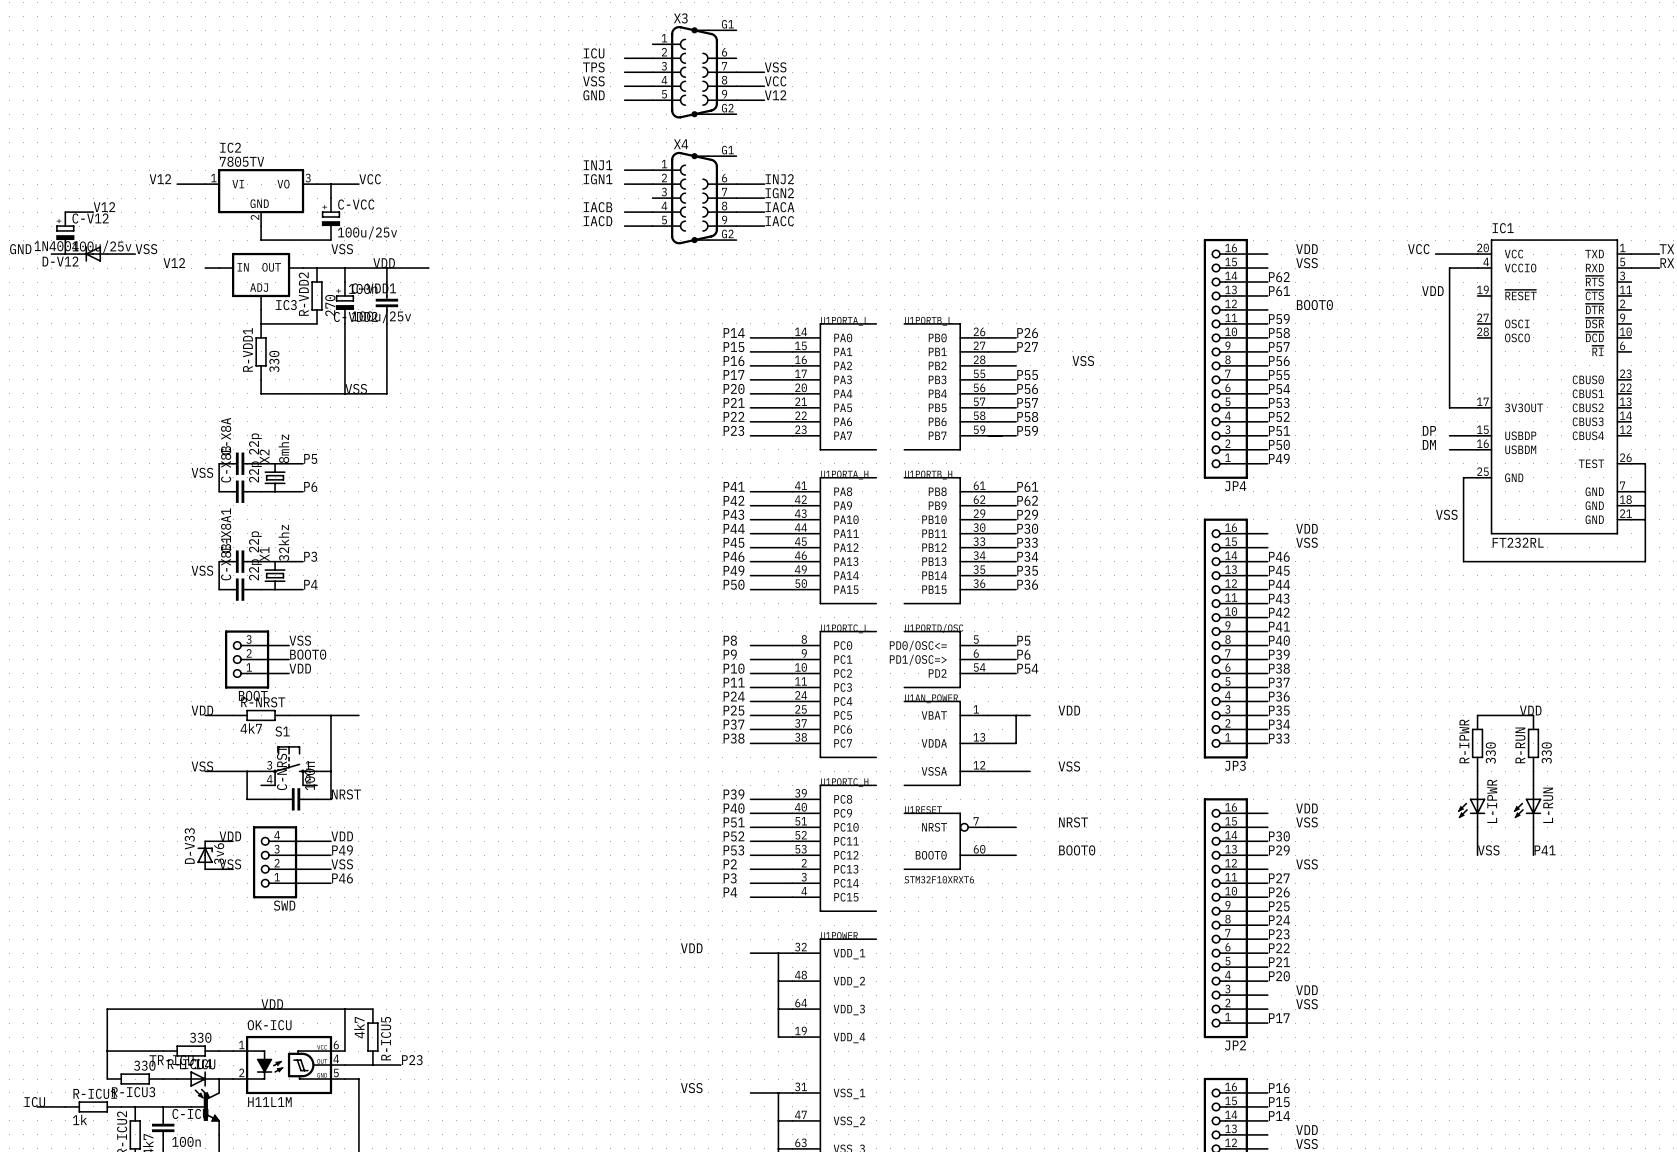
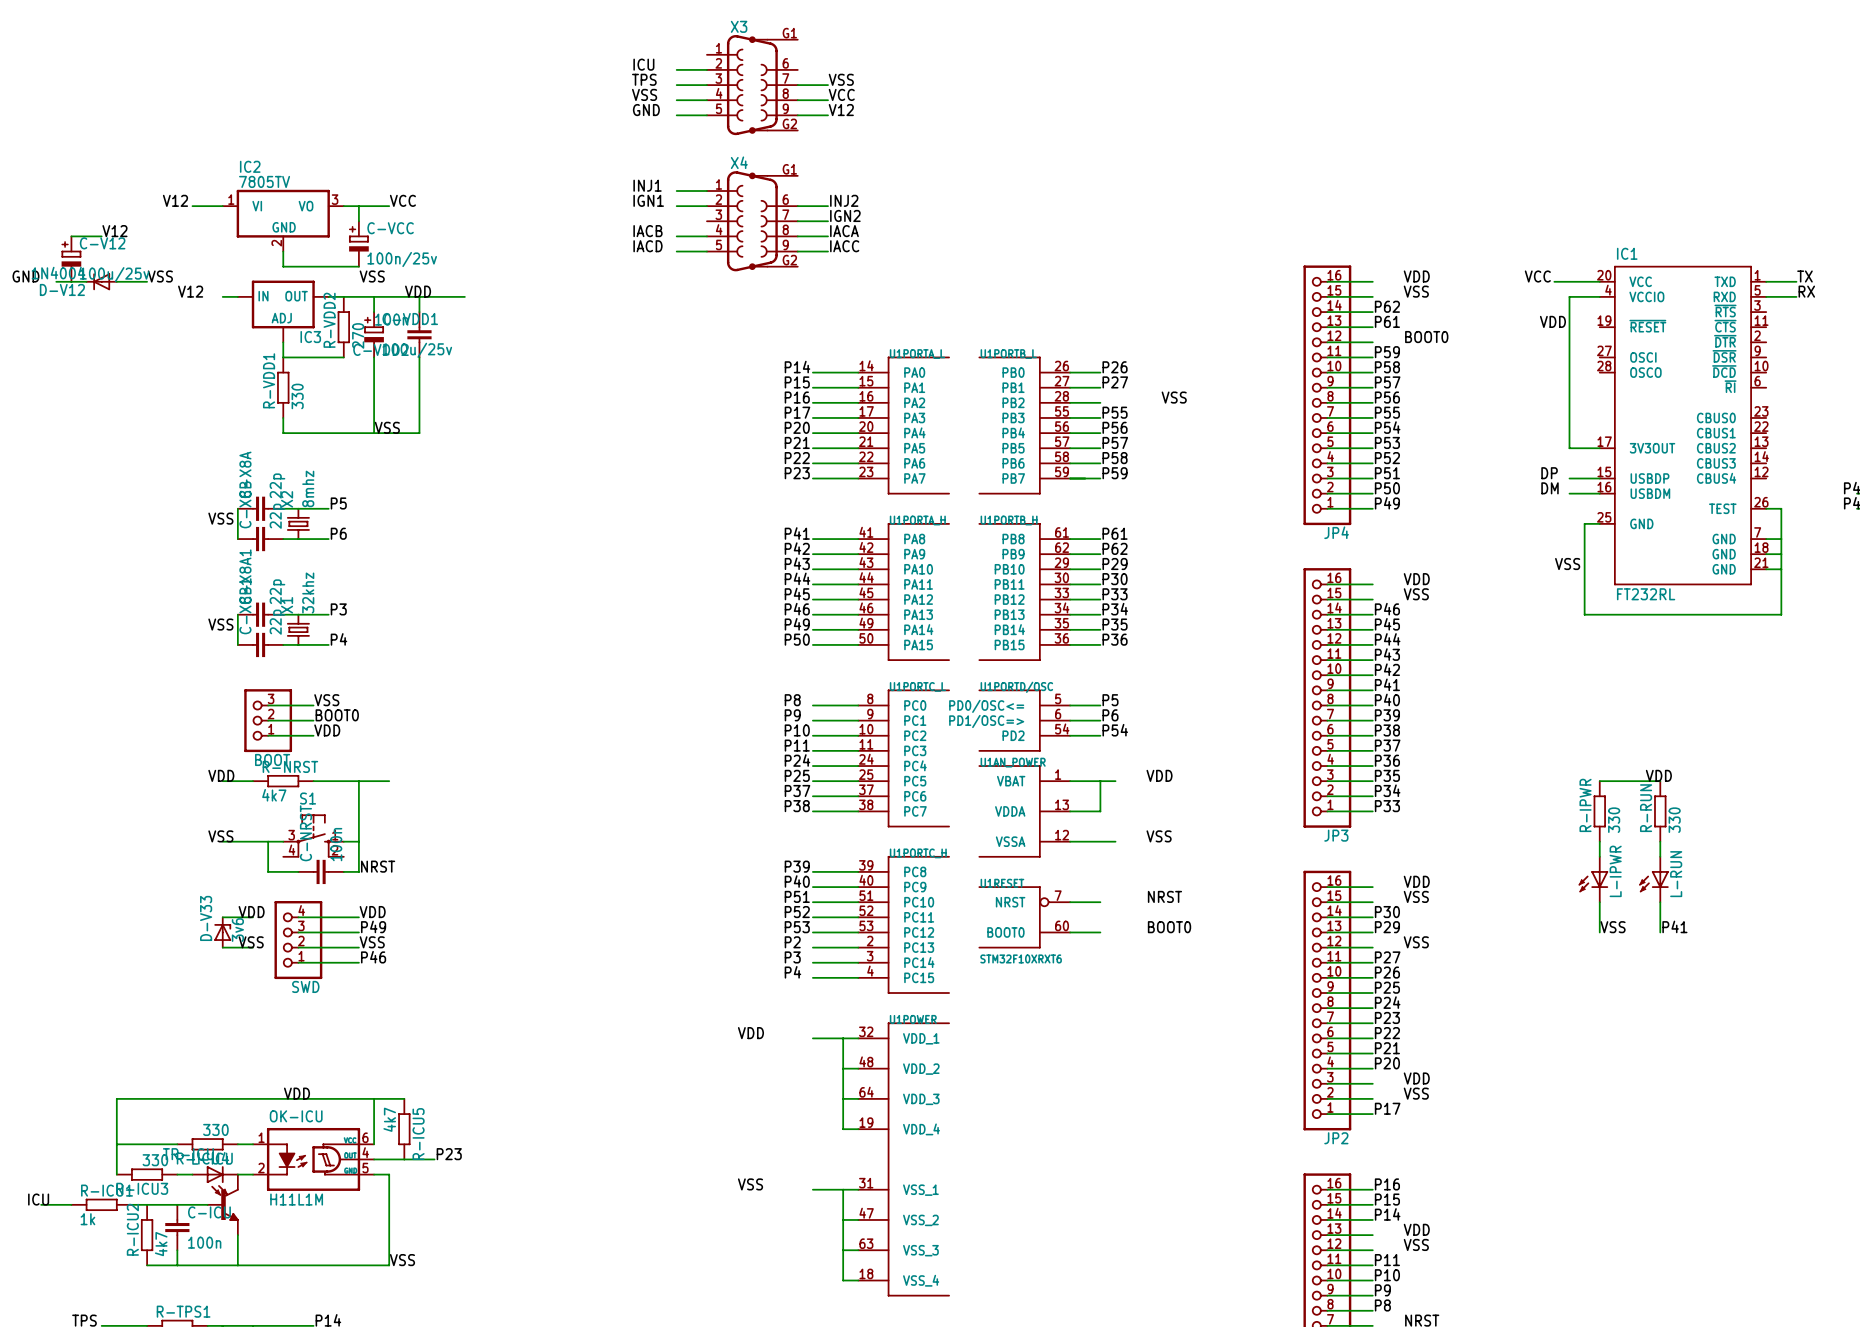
C-VCC value: 100u/25v (367, 233) -> 100n/25v (402, 259)

